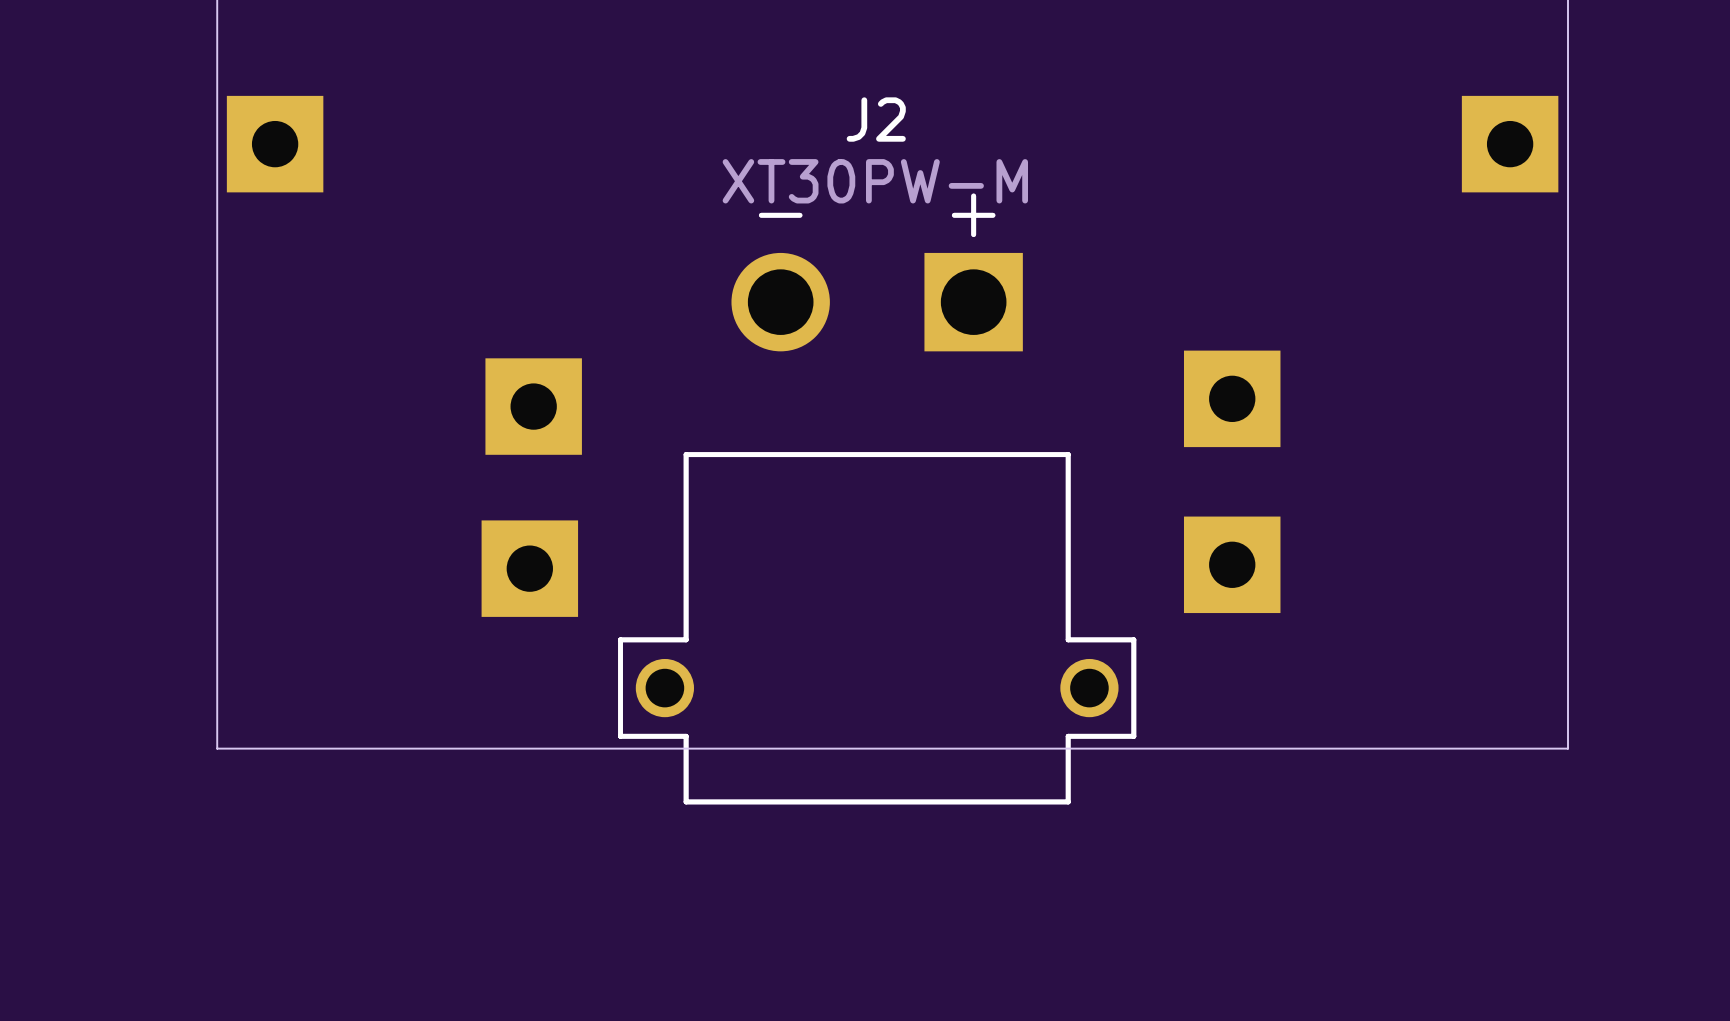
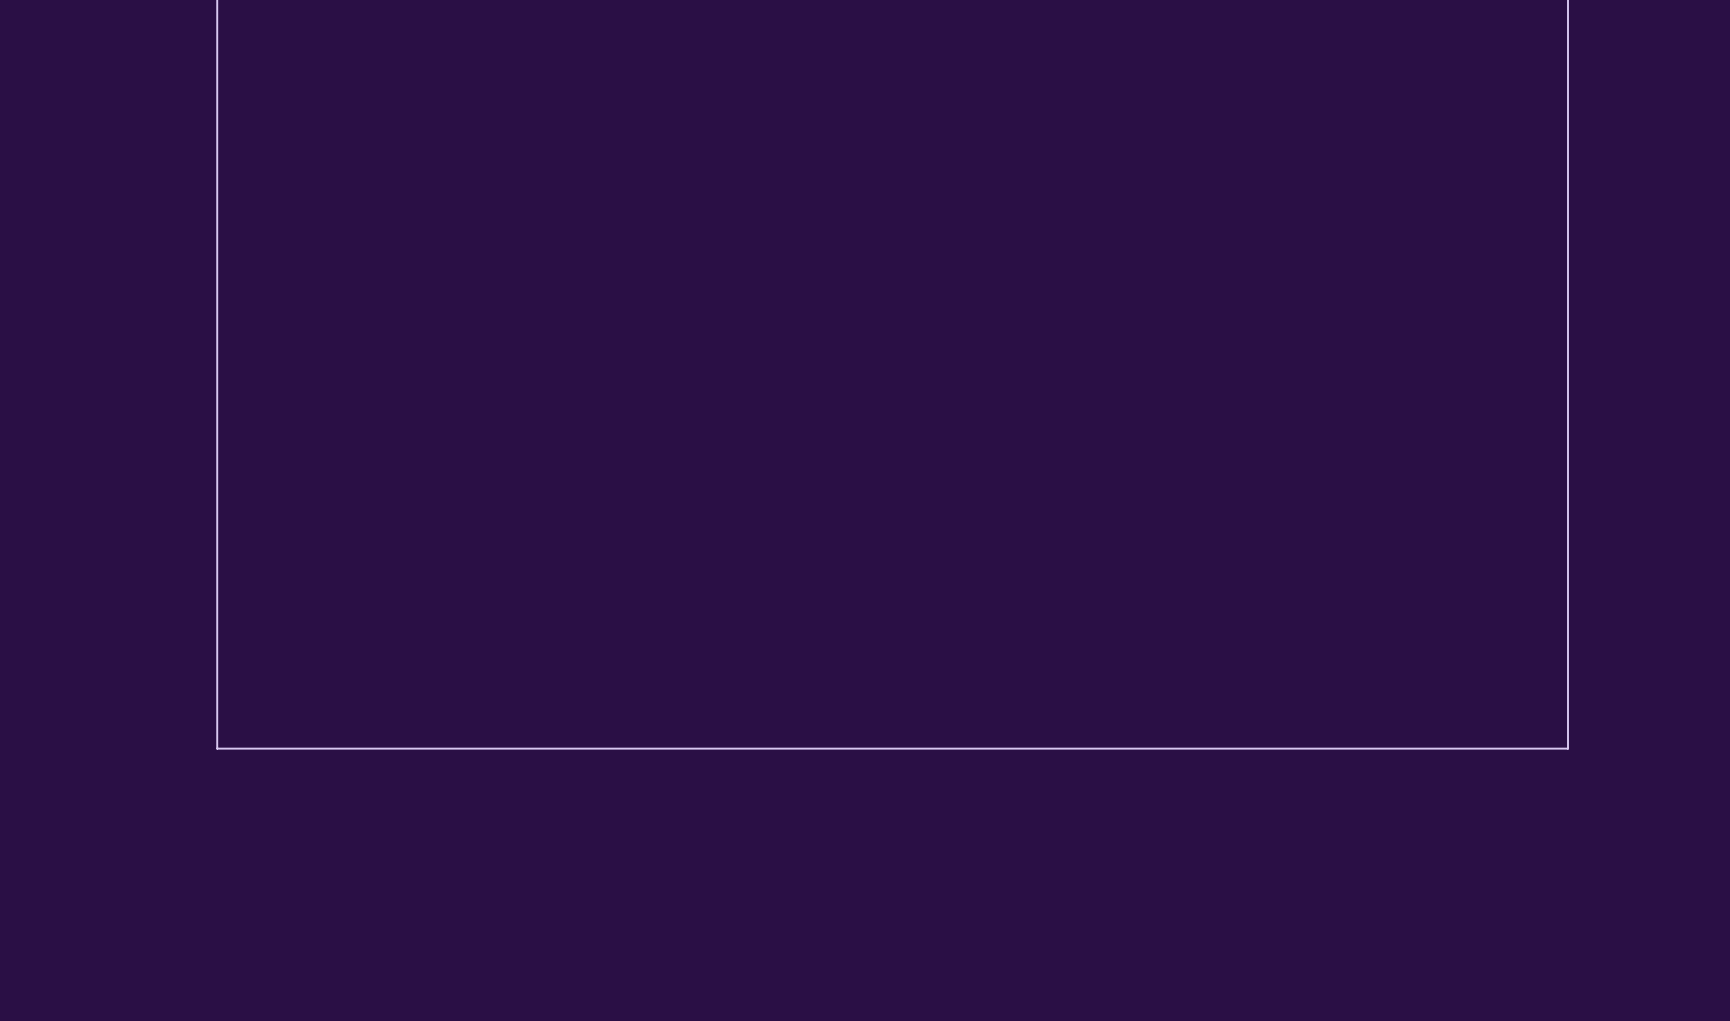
part: (275, 144) -> none
part: (1510, 144) -> none
part: (1232, 398) -> none
part: (533, 406) -> none
J2: XT30PW-M (877, 498) -> none
part: (1232, 564) -> none
part: (529, 568) -> none

